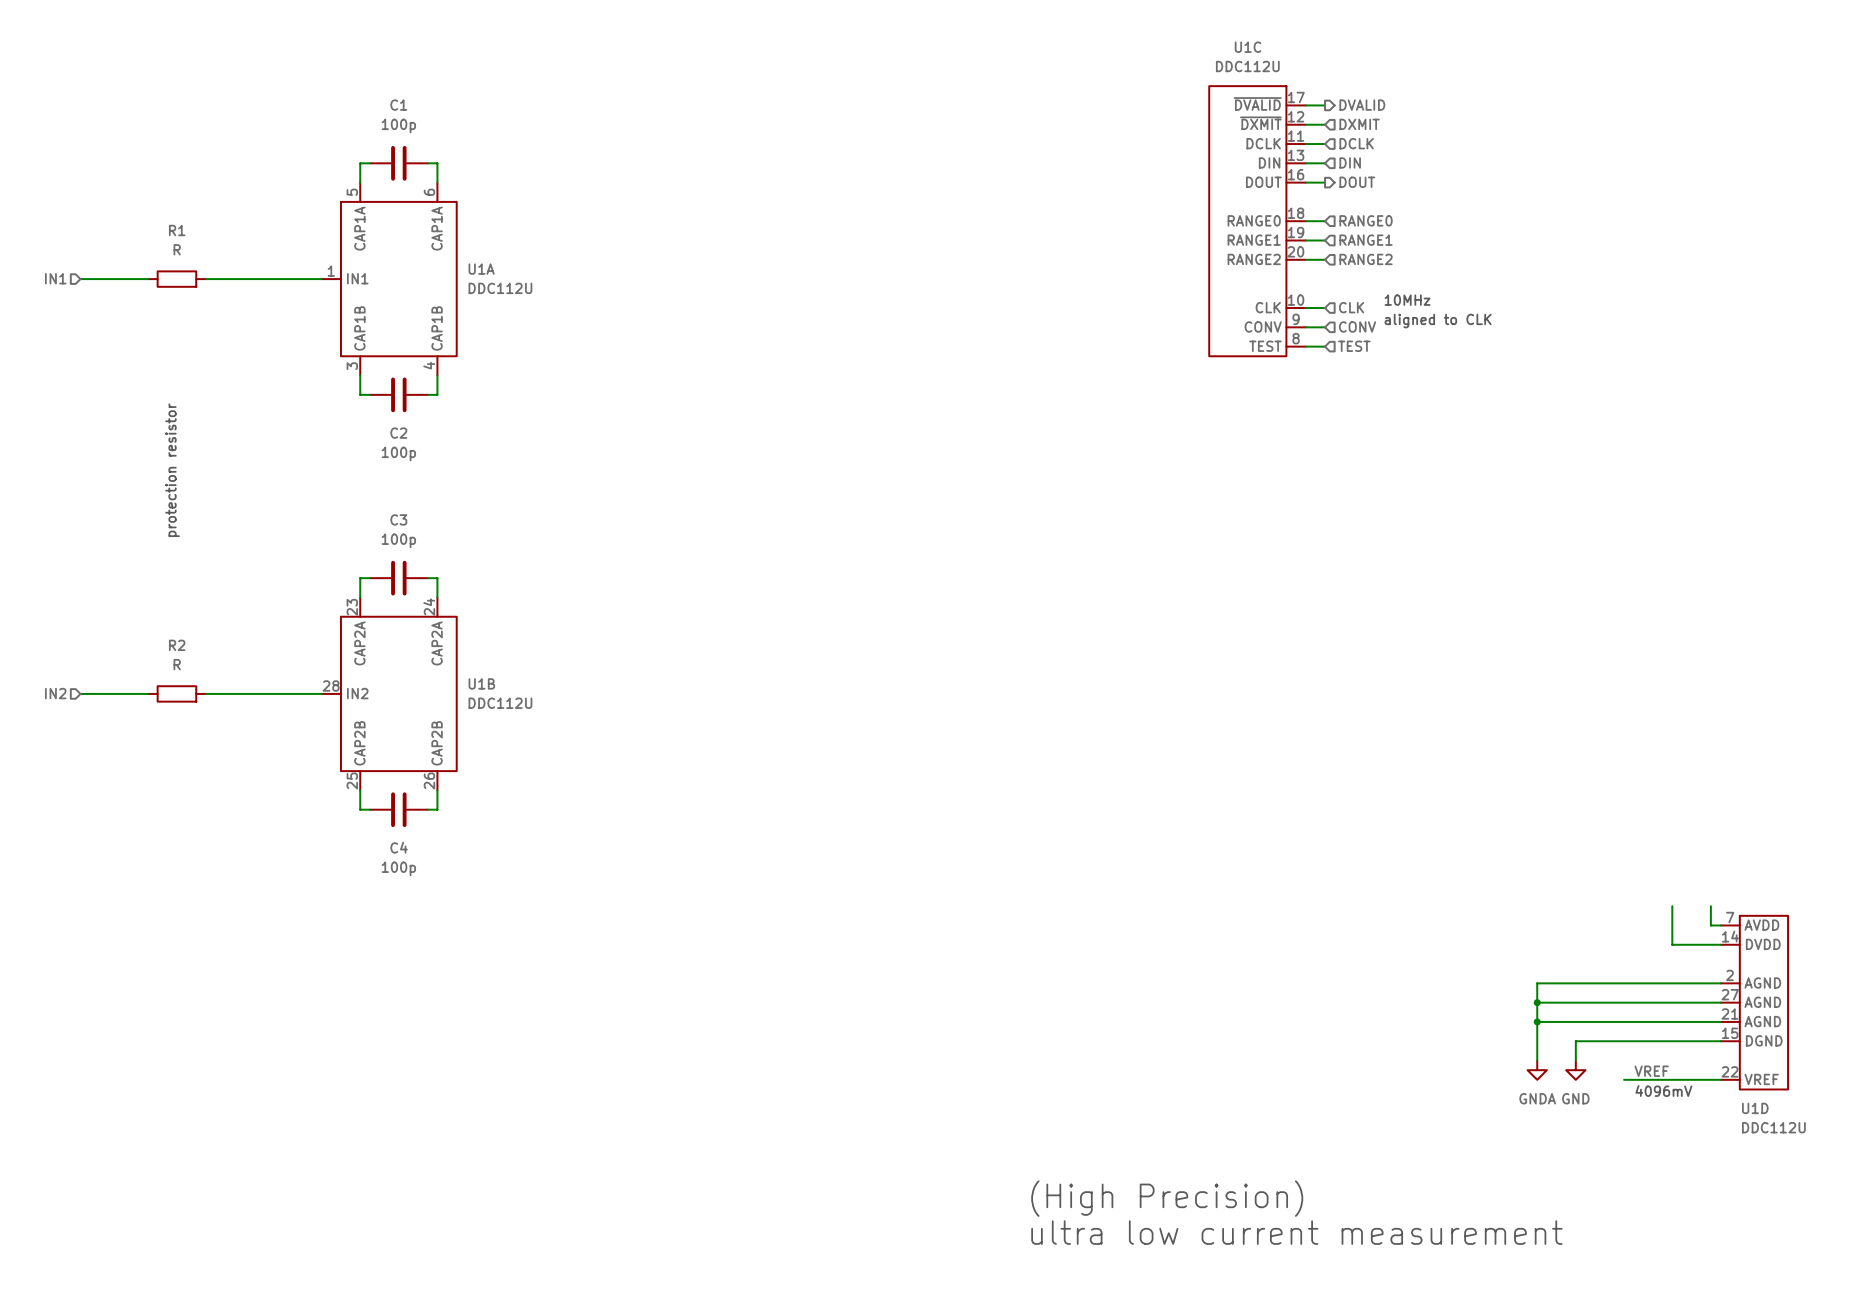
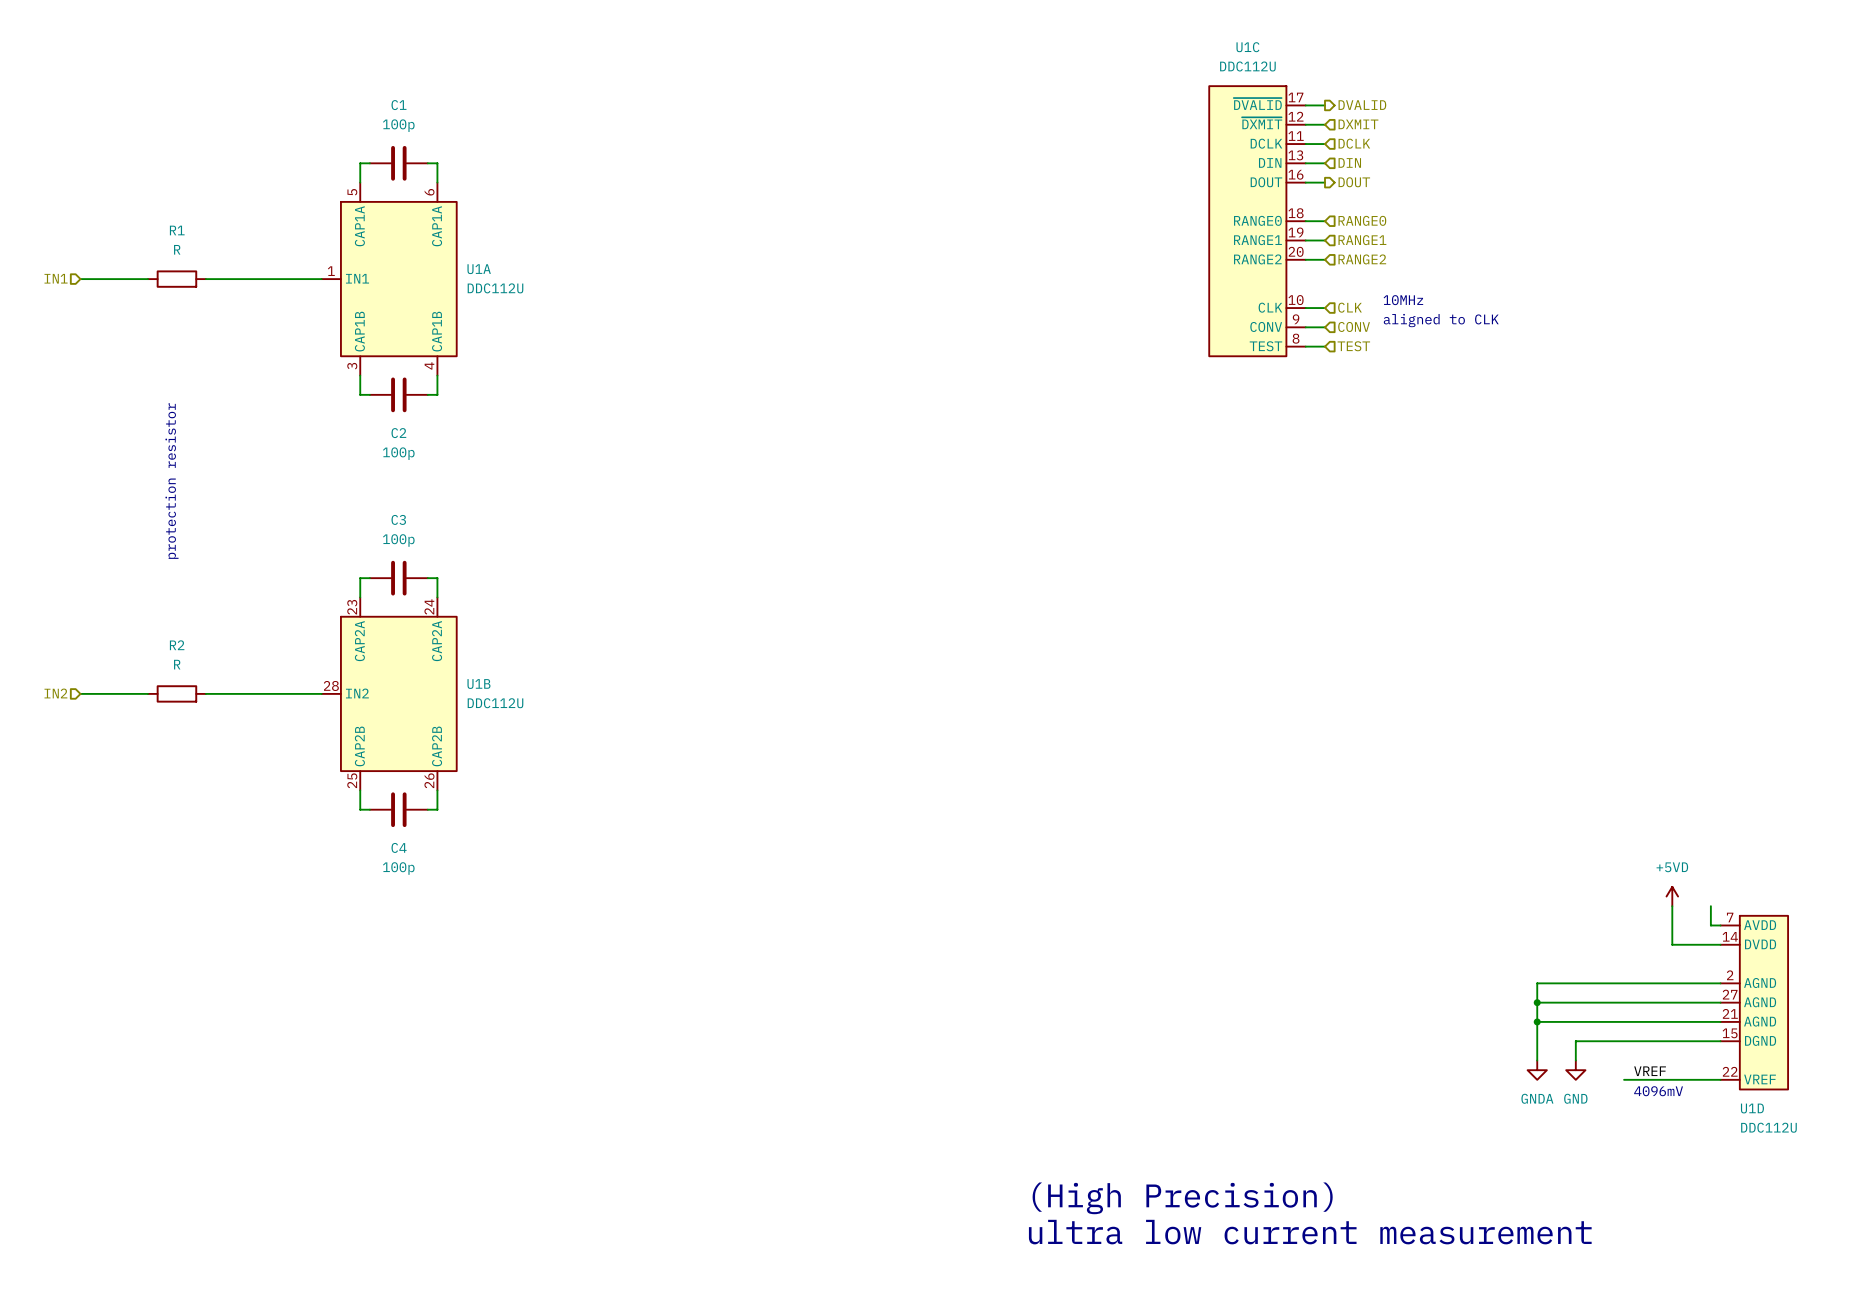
power symbol: none -> +5VD (1672, 896)

